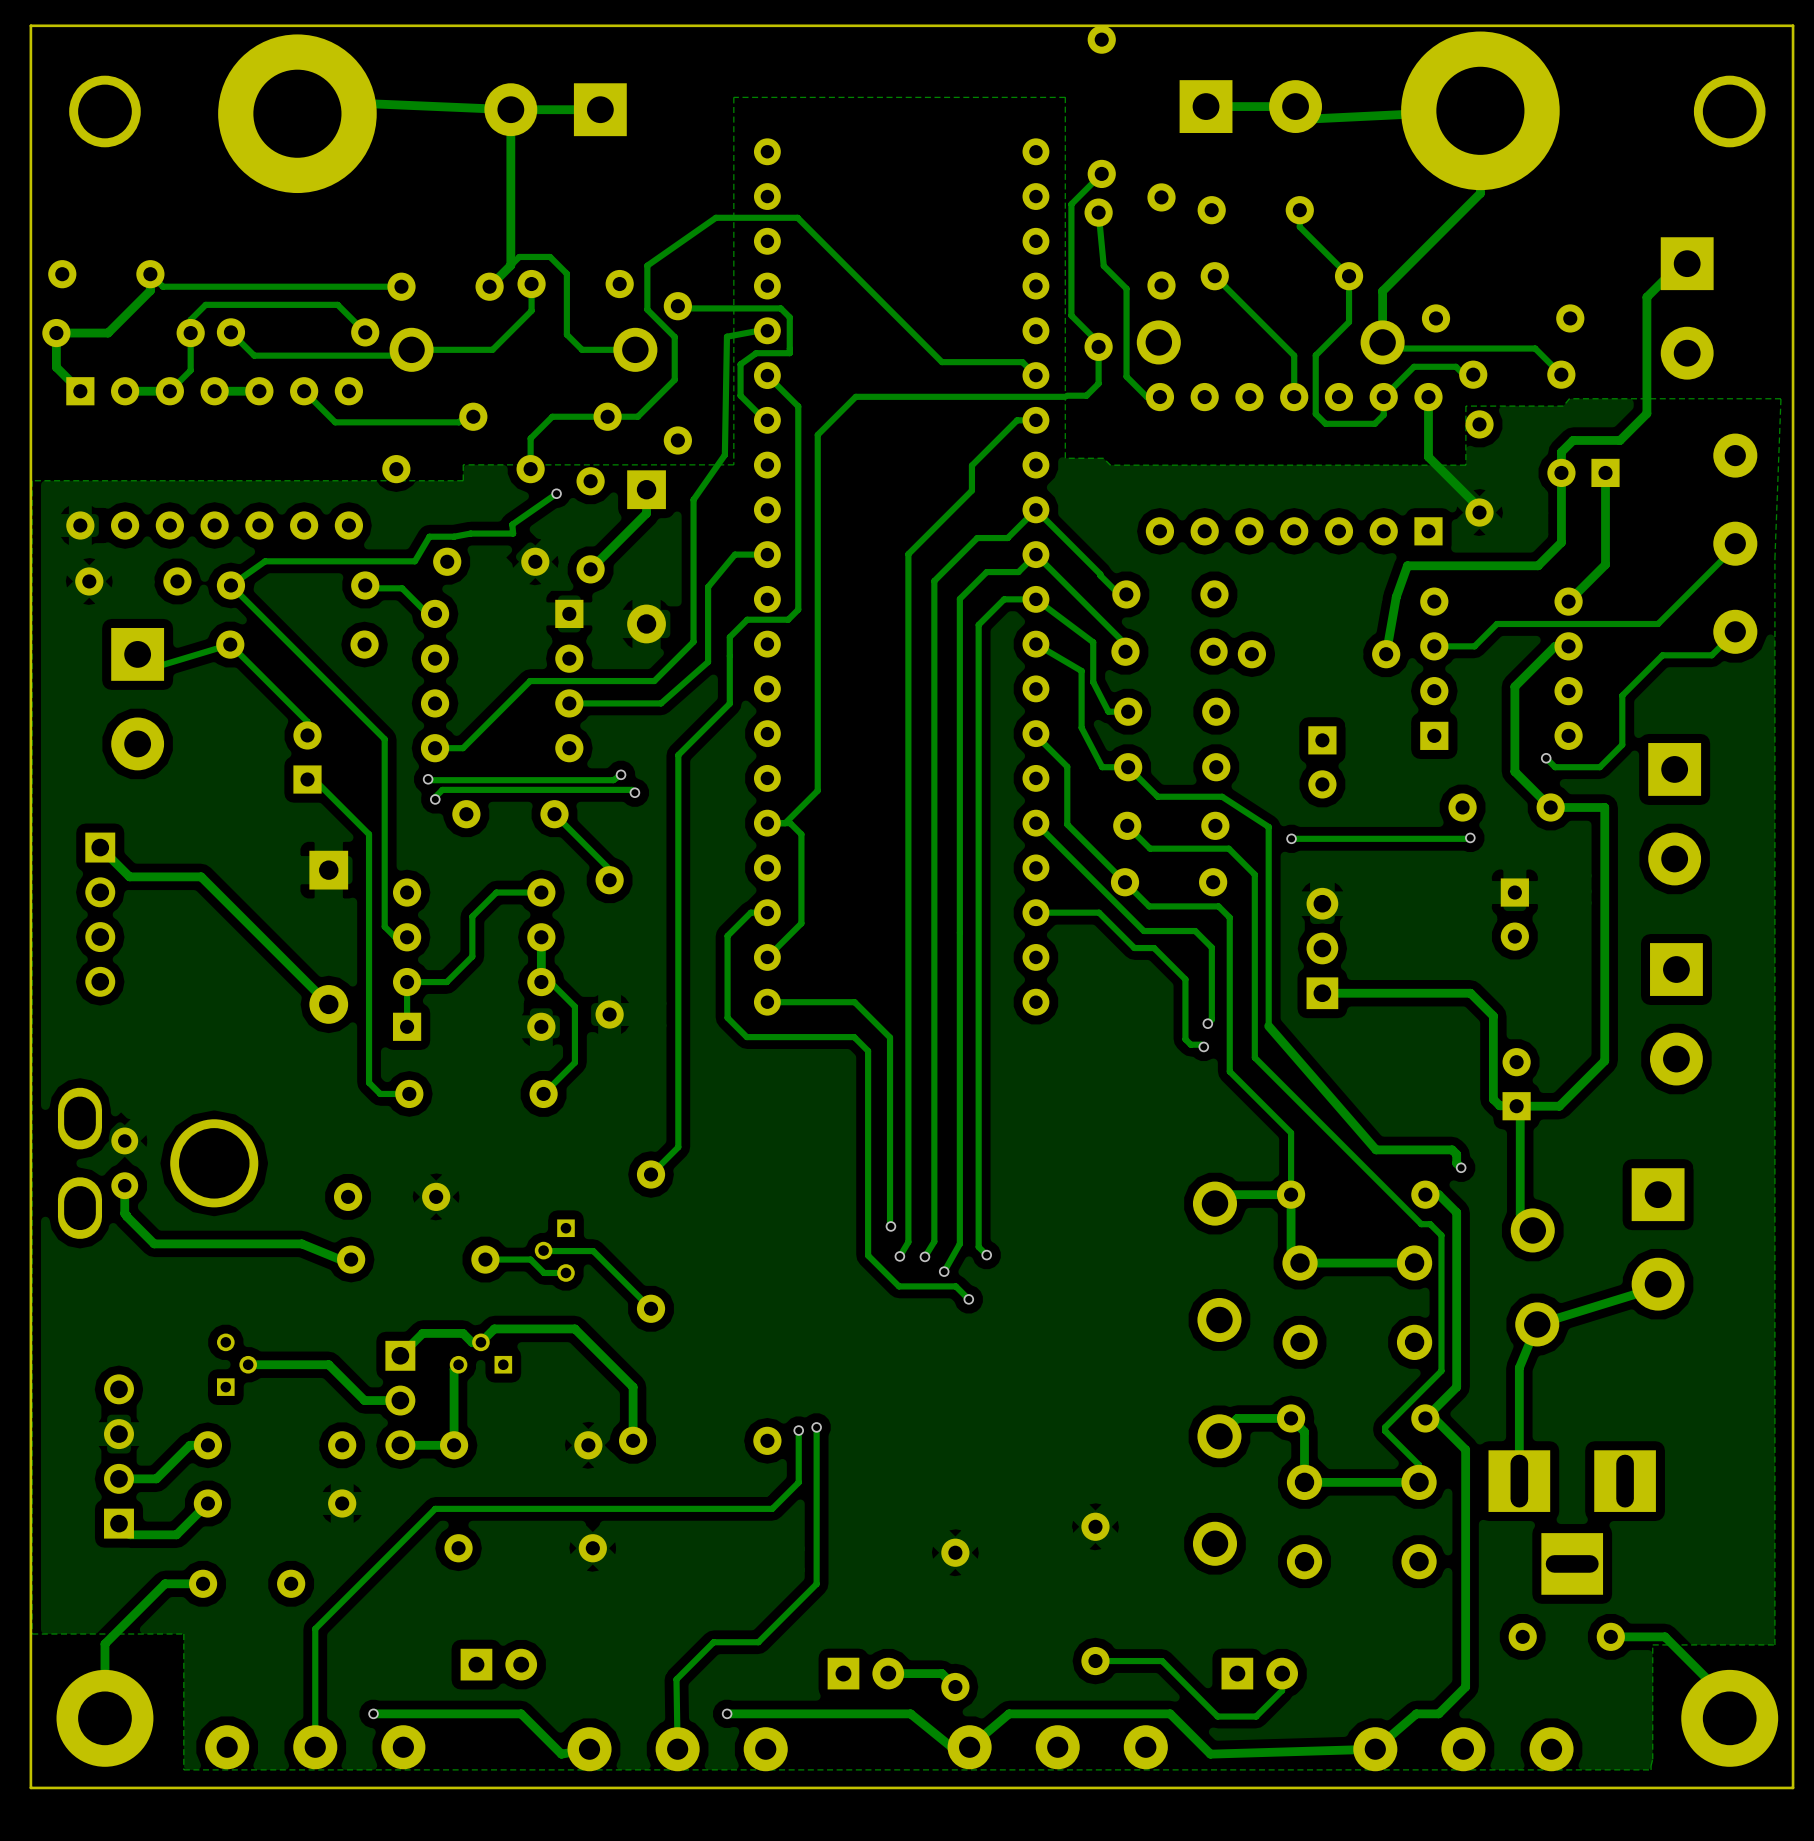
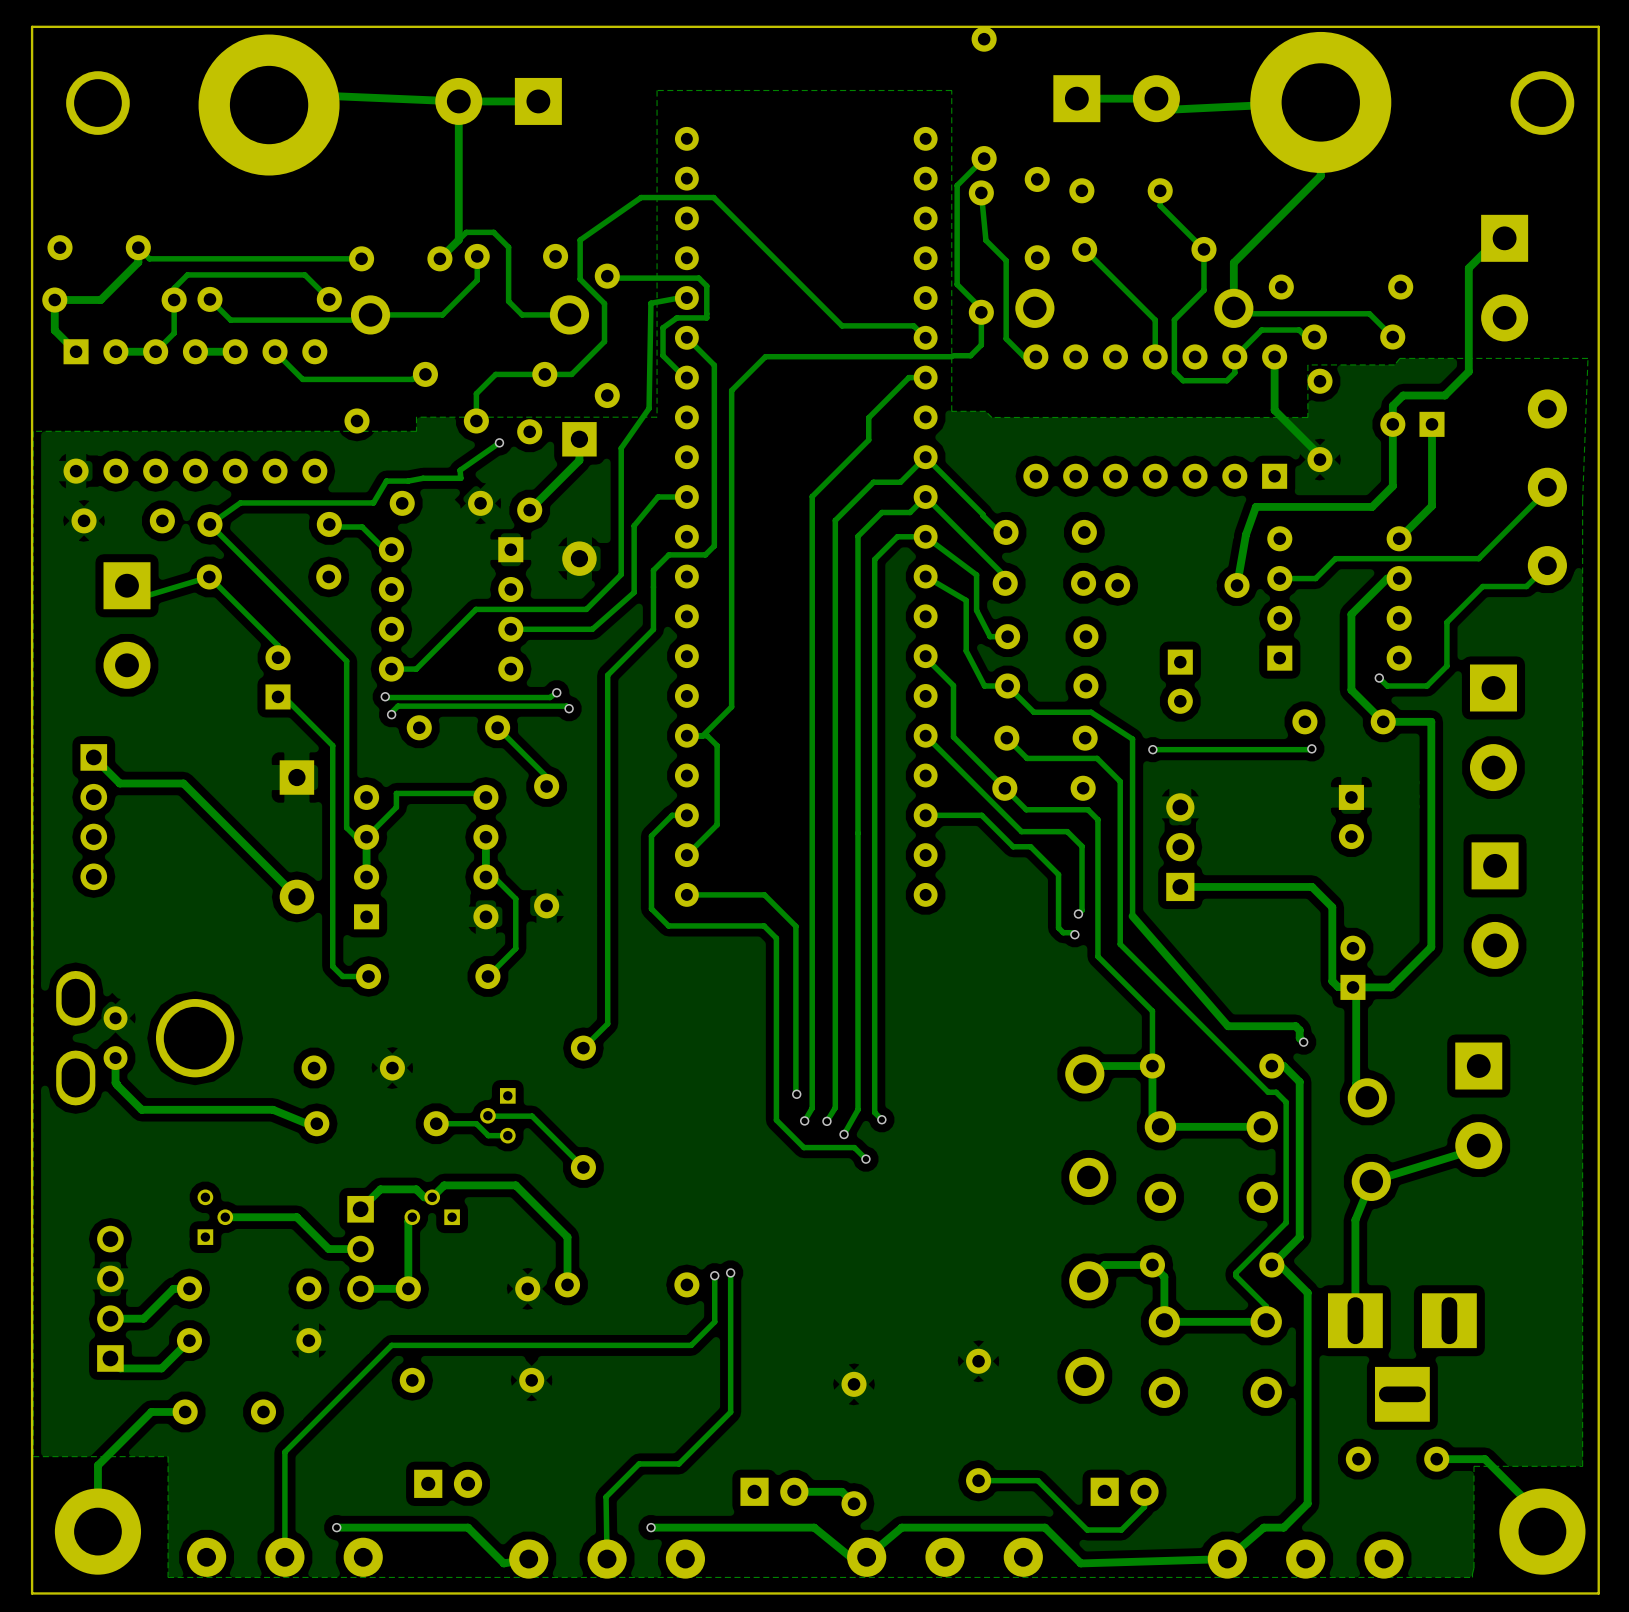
track: none -> (481, 793) (396, 793) (396, 807) (366, 837) (366, 877)
track: (541, 892) (496, 892) (472, 916) (472, 956) (446, 982) (407, 982) (407, 1026) -> none

